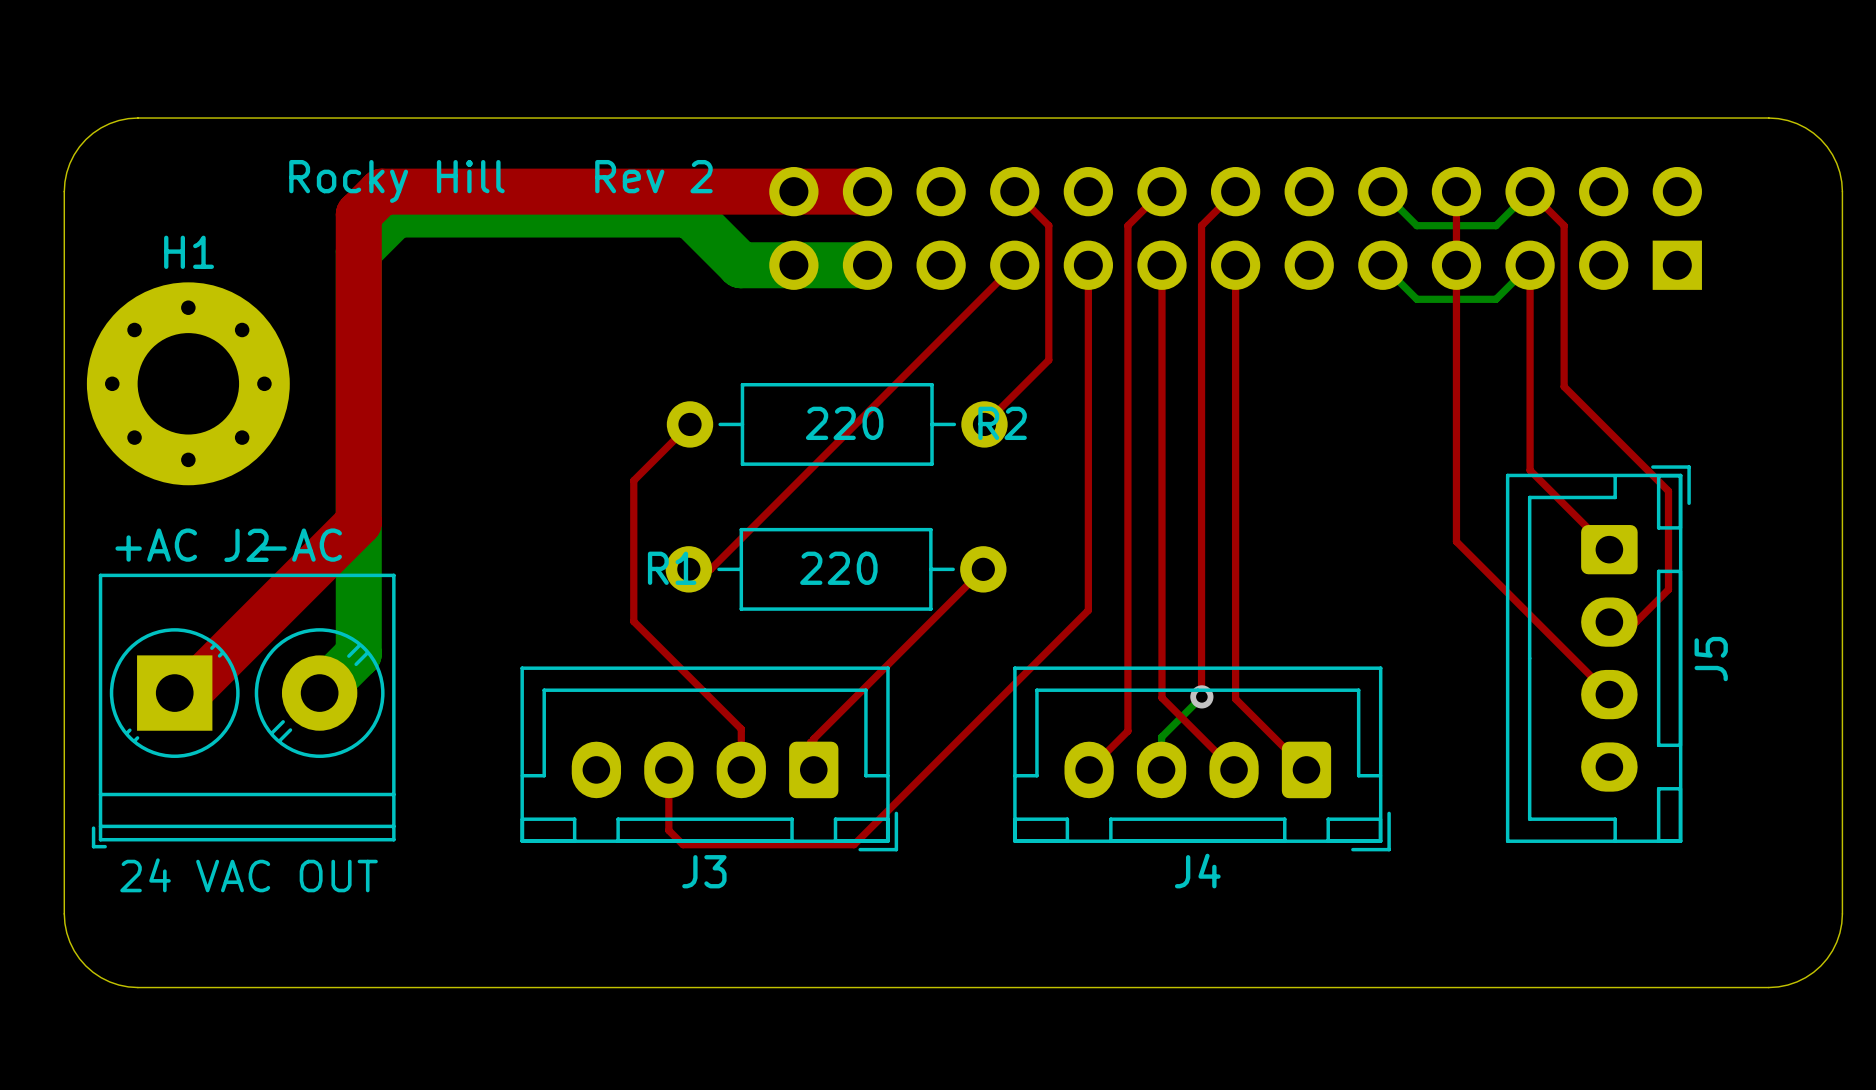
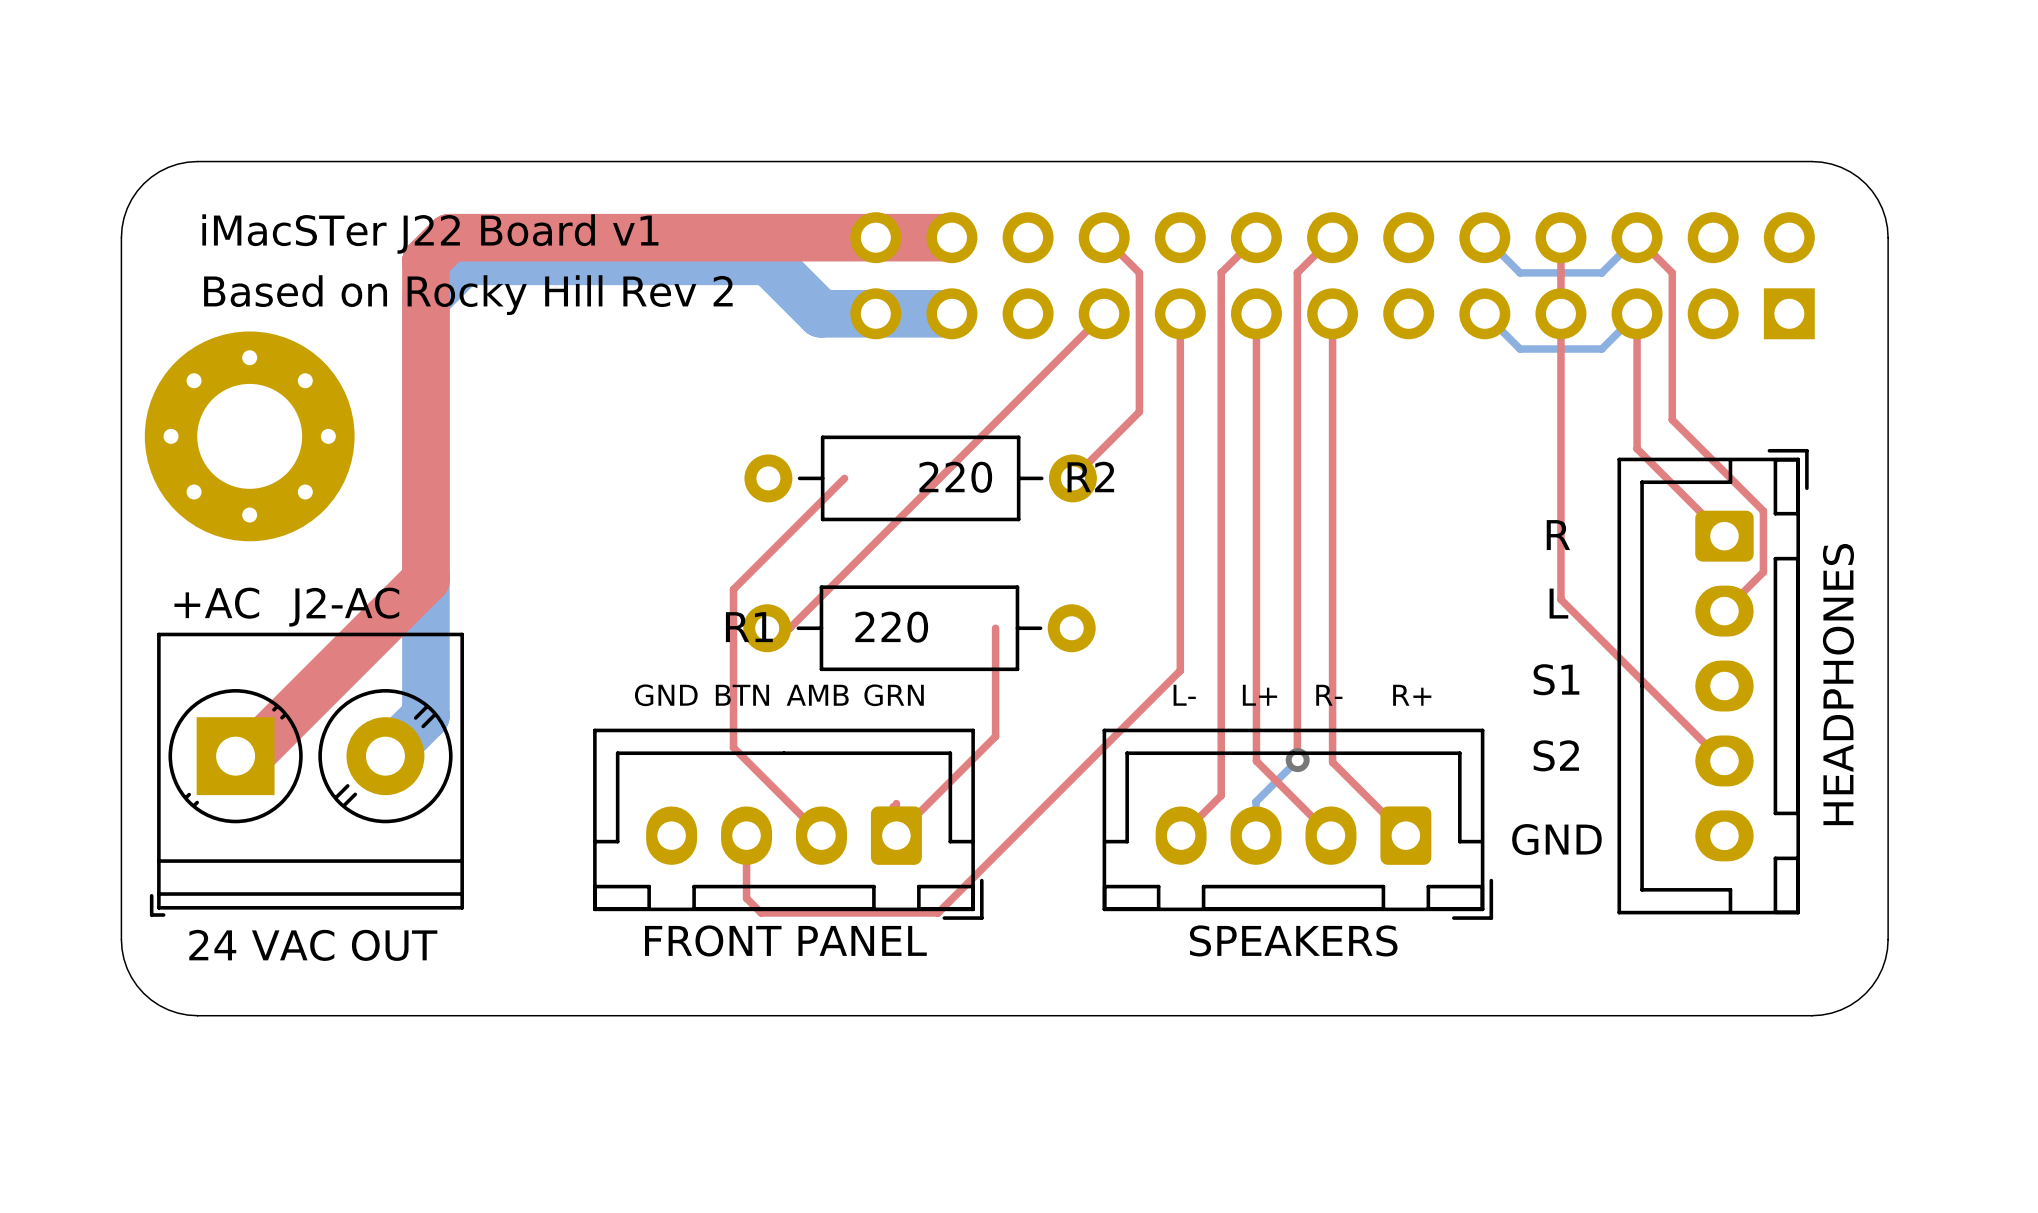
board edge: (1699, 118) (1768, 118) (1796, 123) (1813, 133) (1827, 146) (1836, 163) (1841, 182) (1842, 913) (1839, 932) (1832, 950) (1820, 965) (1796, 981) (1768, 987) (137, 987) (118, 985) (101, 977) (85, 965) (74, 950) (64, 923) (64, 870) -> (1811, 161) (1841, 167) (1865, 183) (1882, 208) (1888, 237) (1888, 939) (1885, 959) (1877, 977) (1865, 993) (1841, 1009) (1811, 1015) (197, 1015) (168, 1009) (143, 993) (127, 968) (121, 939)
text: Rev 2 (653, 176) -> none
text: Rocky Hill (396, 181) -> none
text: none -> iMacSTer J22 Board v1 (430, 234)
text: none -> Based on Rocky Hill Rev 2 (468, 295)
H1 name: H1 (189, 252) -> none
top track: (1564, 367) (1564, 386) (1668, 491) (1668, 589) (1636, 622) -> (1672, 419) (1763, 511) (1763, 572) (1724, 611)
top track: (1530, 395) (1530, 470) (1609, 549) -> (1637, 448) (1724, 536)
text position: 220 (844, 423) -> 220 (955, 477)
top track: (690, 424) (633, 480) (633, 621) (741, 729) (741, 769) -> (844, 478) (733, 589) (733, 747) (821, 835)
text: none -> R (1558, 535)
text: none -> L (1558, 603)
text position: 220 (838, 568) -> 220 (891, 627)
top track: none -> (995, 628) (995, 736) (896, 835)
top track: (983, 569) (813, 738) -> none
text: none -> S1 (1556, 679)
HEADPHONES: none -> (1713, 681)
text: none -> GND (666, 695)
text: none -> BTN (742, 695)
text: none -> AMB (817, 695)
text: none -> GRN (894, 695)
text: none -> L- (1184, 695)
text: none -> L+ (1259, 695)
text: none -> R- (1329, 695)
text: none -> R+ (1412, 695)
J5: (1598, 654) -> none
text: none -> S2 (1556, 755)
text: none -> GND (1556, 839)
J3 name: J3 (704, 871) -> FRONT PANEL (785, 940)
J4 name: J4 (1197, 871) -> SPEAKERS (1293, 940)

